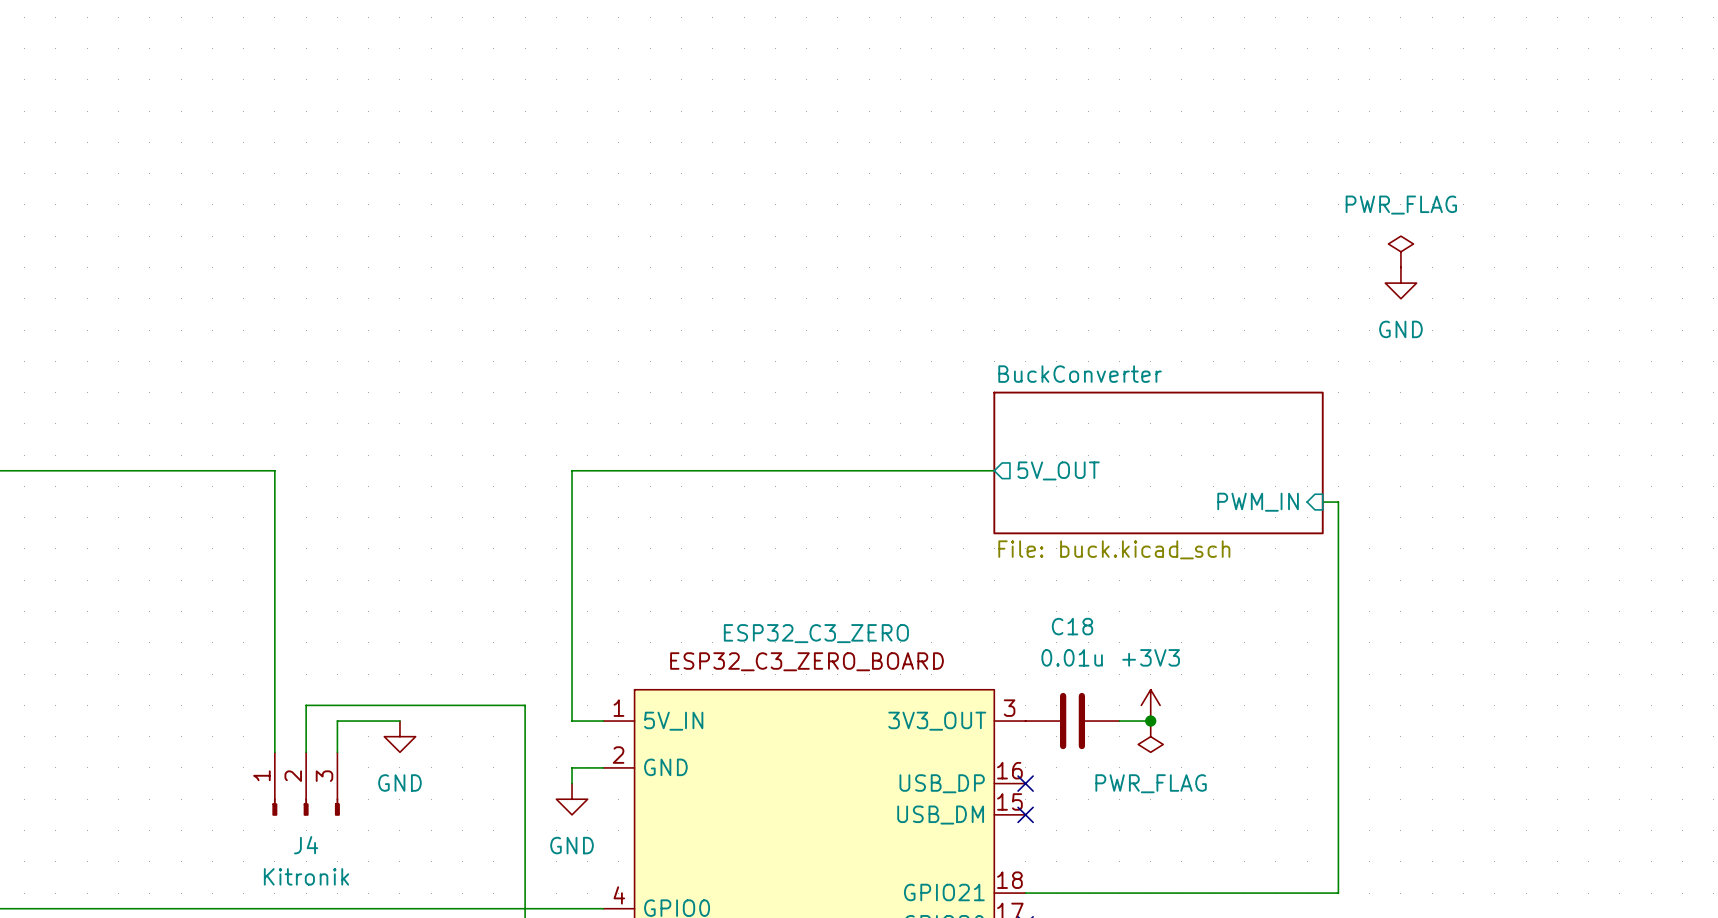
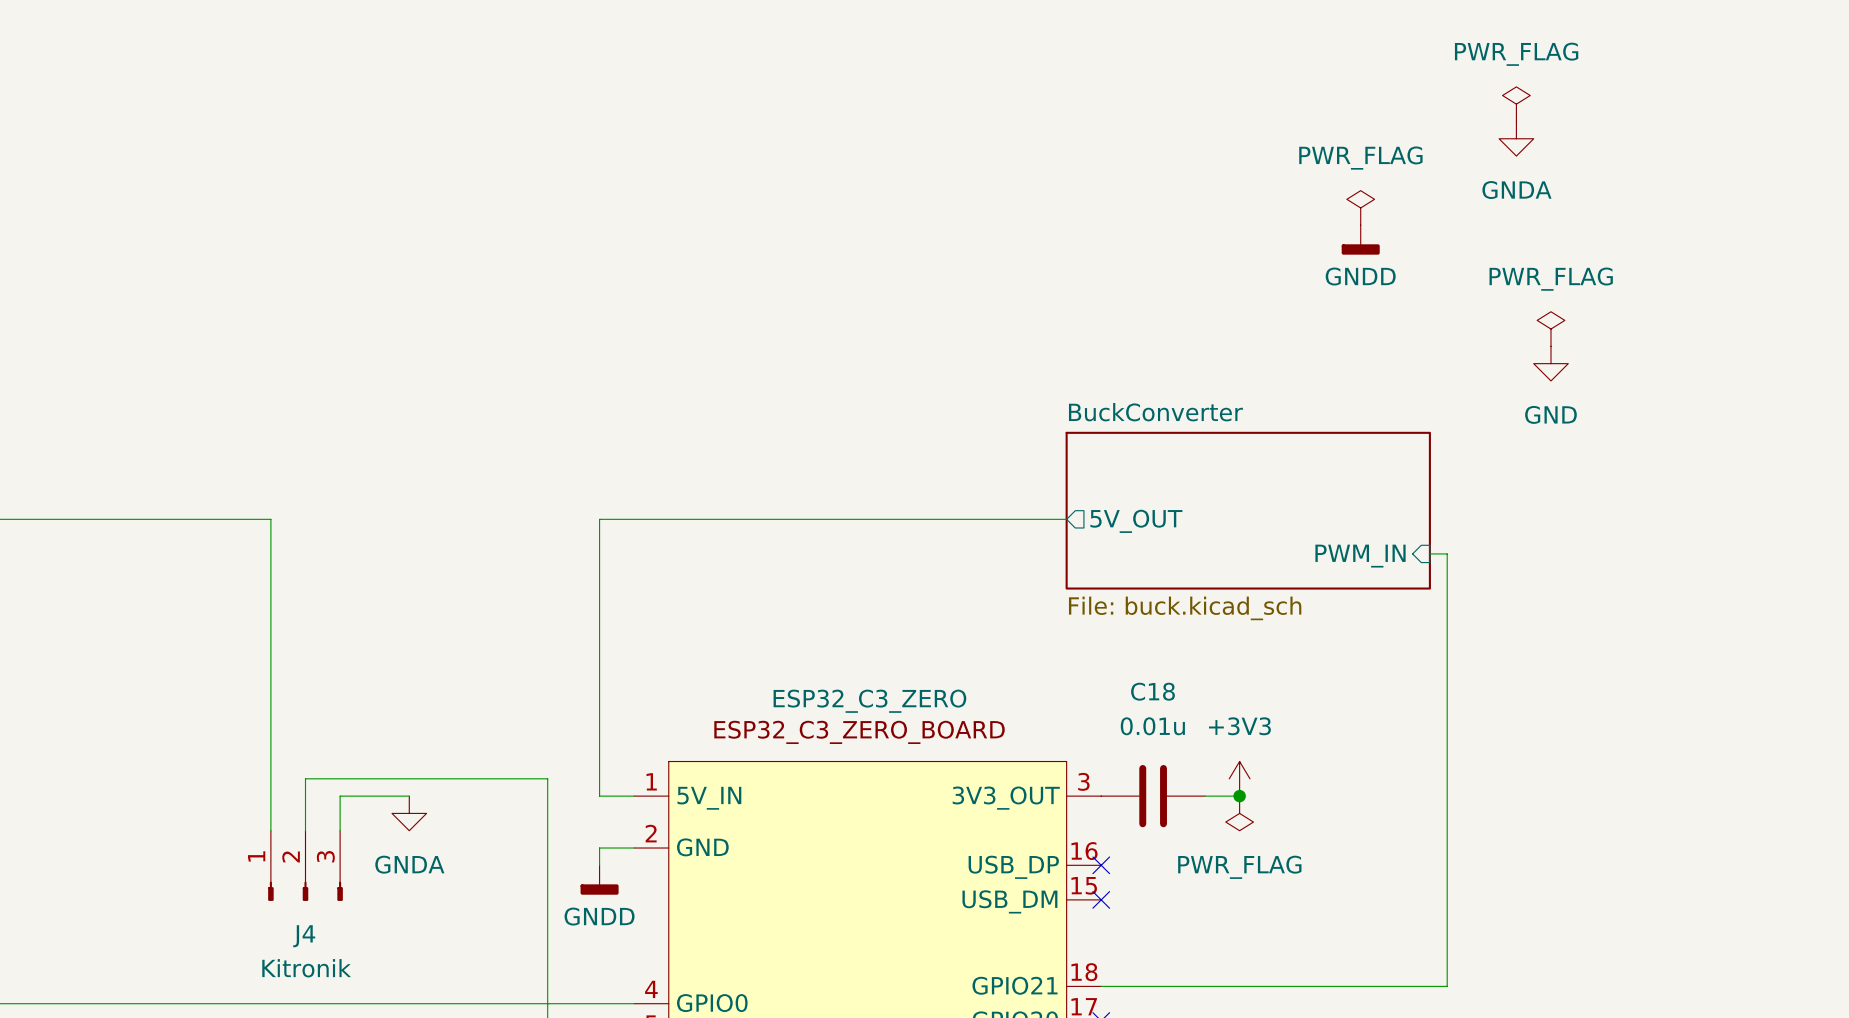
power symbol: none -> PWR_FLAG (1516, 104)
power symbol: none -> GNDA (1516, 138)
power symbol: none -> PWR_FLAG (1360, 207)
power symbol: none -> GNDD (1360, 239)
power symbol position: PWR_FLAG (1400, 251) -> PWR_FLAG (1551, 329)
power symbol position: GND (1400, 283) -> GND (1551, 363)
power symbol: GND (399, 736) -> GNDA (409, 813)
power symbol: GND (572, 799) -> GNDD (599, 880)

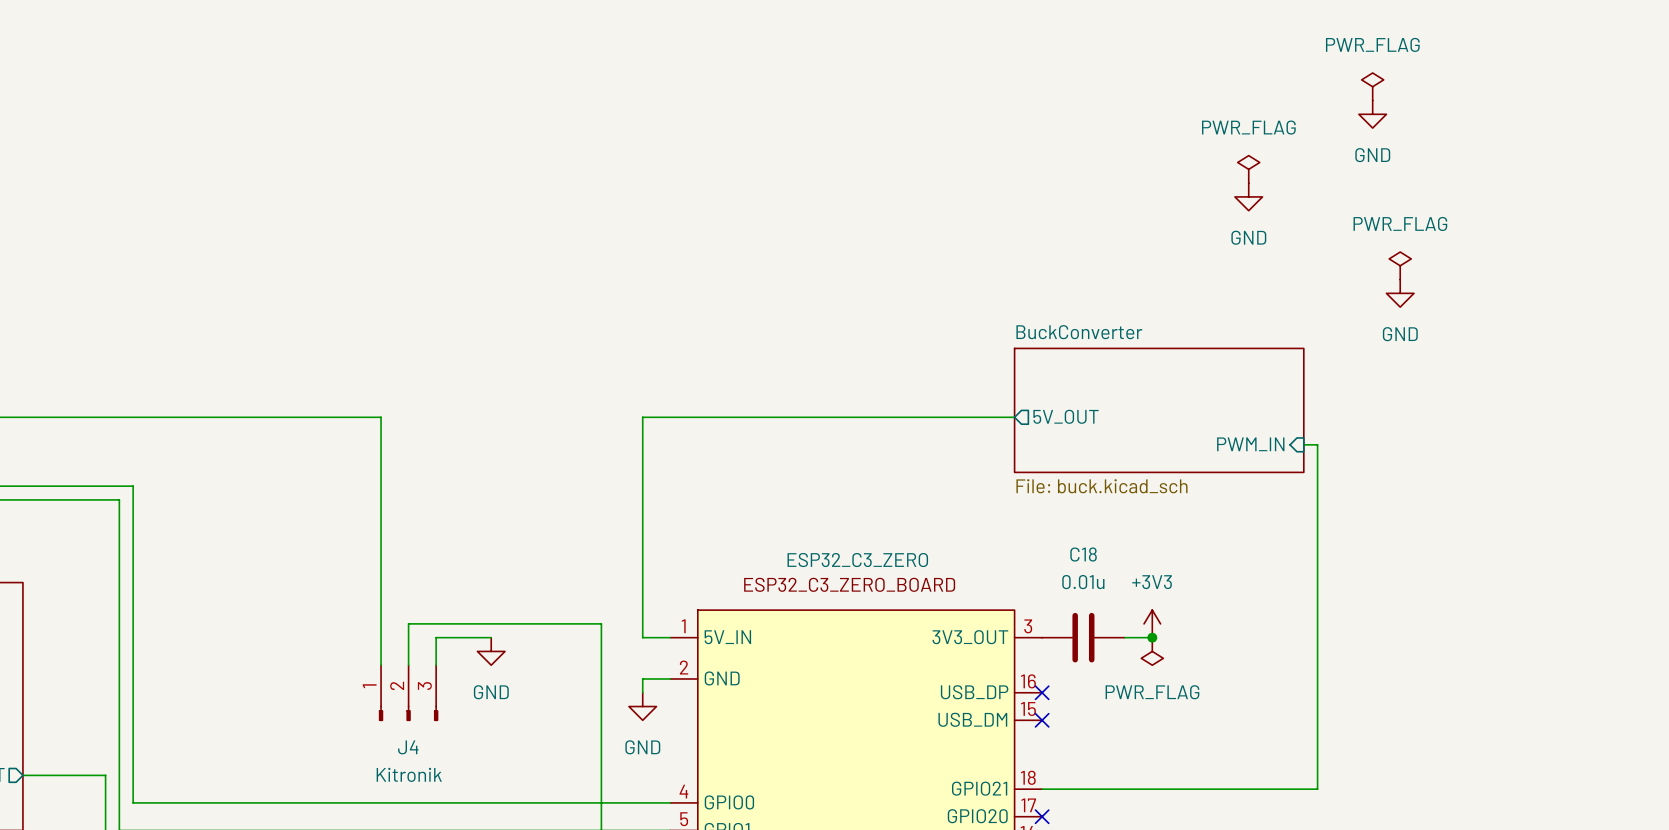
power symbol: GNDA (1516, 138) -> GND (1372, 114)
power symbol: GNDD (1360, 239) -> GND (1248, 196)
power symbol: GNDA (409, 813) -> GND (491, 651)
power symbol: GNDD (599, 880) -> GND (642, 706)

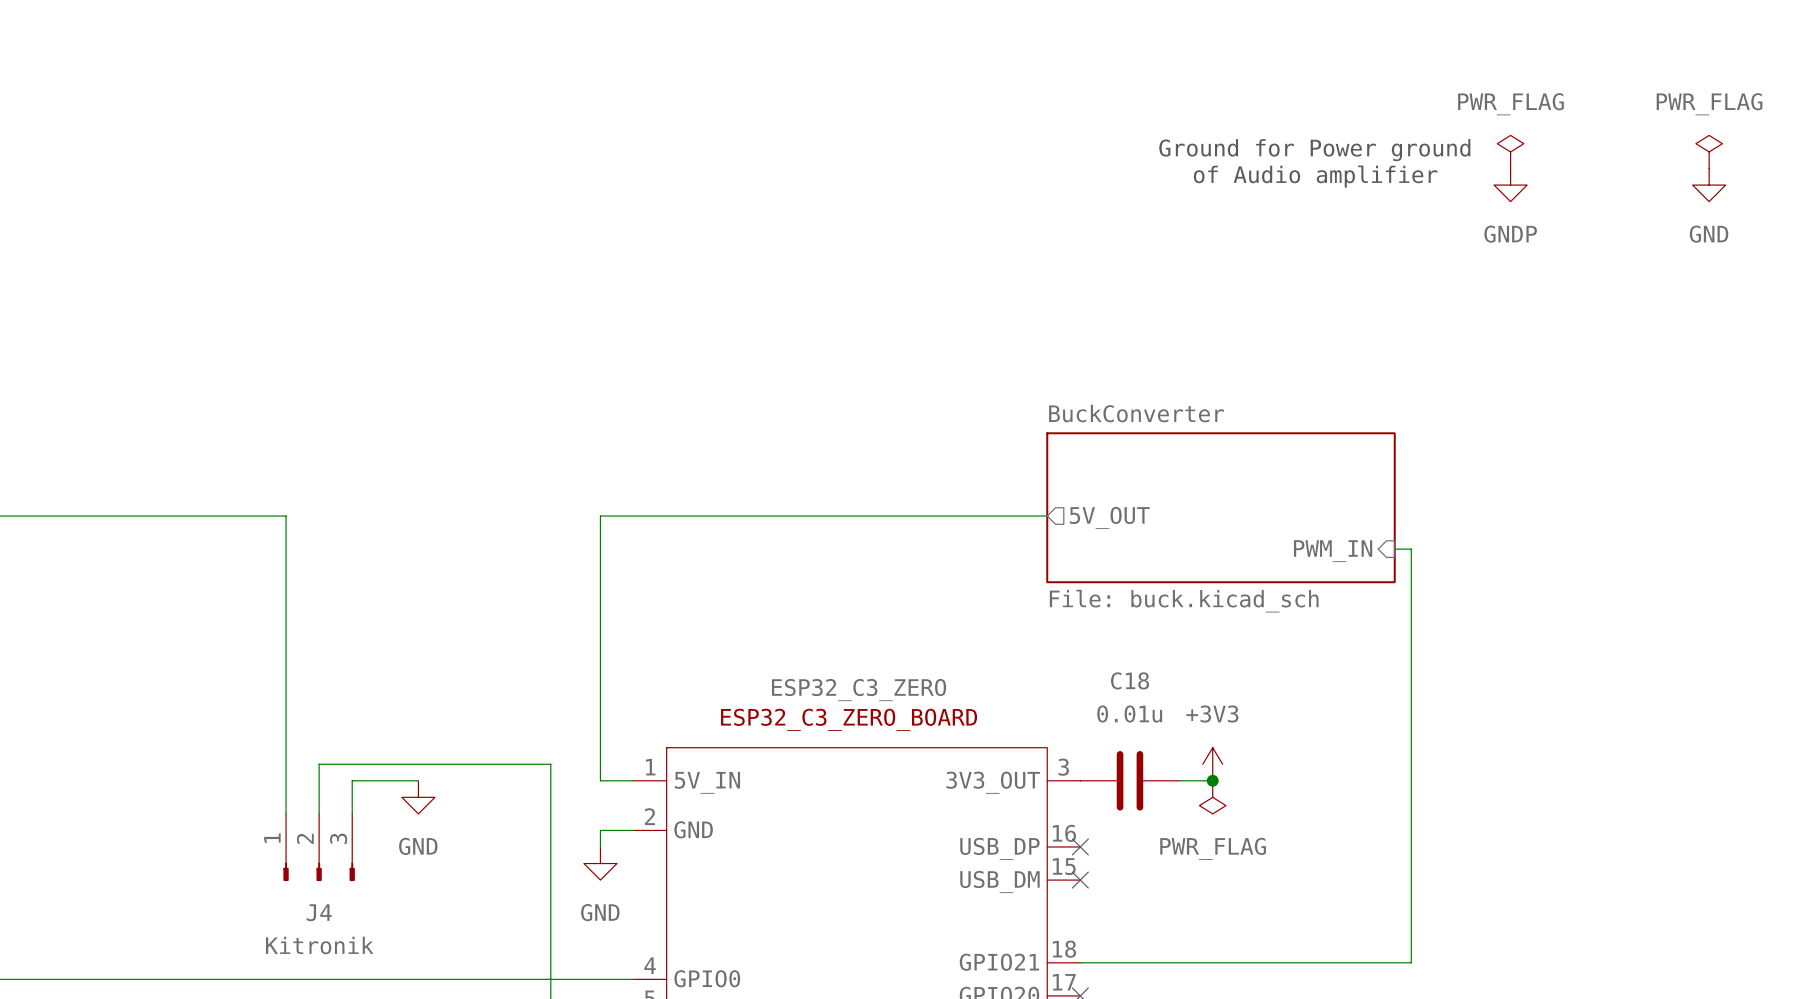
power symbol position: PWR_FLAG (1372, 86) -> PWR_FLAG (1510, 151)
text: none -> Ground for Power ground (1314, 150)
power symbol: GND (1372, 114) -> none
power symbol: none -> PWR_FLAG (1709, 151)
text: none -> of Audio amplifier (1315, 176)
power symbol: none -> GNDP (1510, 185)
power symbol: none -> GND (1709, 185)
power symbol: PWR_FLAG (1248, 169) -> none
power symbol: GND (1248, 196) -> none
power symbol: PWR_FLAG (1400, 265) -> none
power symbol: GND (1400, 293) -> none

